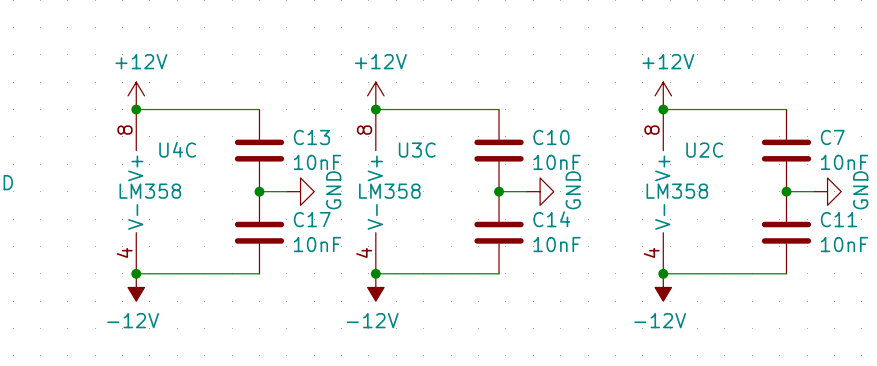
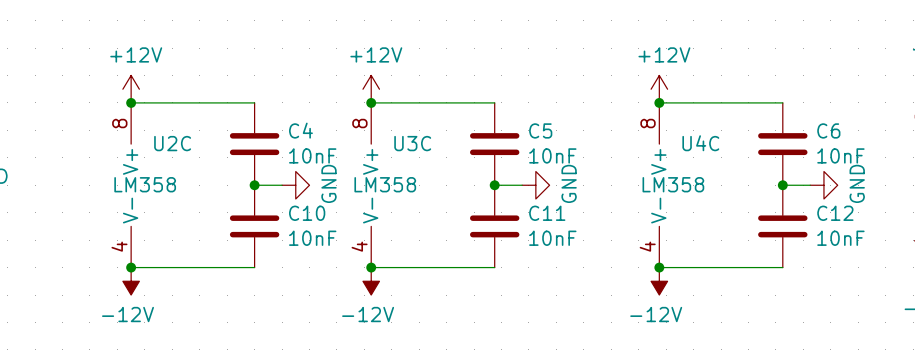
C13 name: C13 (311, 137) -> C4 (300, 130)
C10 name: C10 (551, 137) -> C5 (540, 130)
C7 name: C7 (832, 137) -> C6 (828, 130)
U4C name: U4C (177, 149) -> U2C (172, 143)
U2C name: U2C (704, 150) -> U4C (700, 143)
C17 name: C17 (312, 219) -> C10 (307, 213)
C14 name: C14 (551, 219) -> C11 (547, 213)
C11 name: C11 (838, 219) -> C12 (835, 213)

